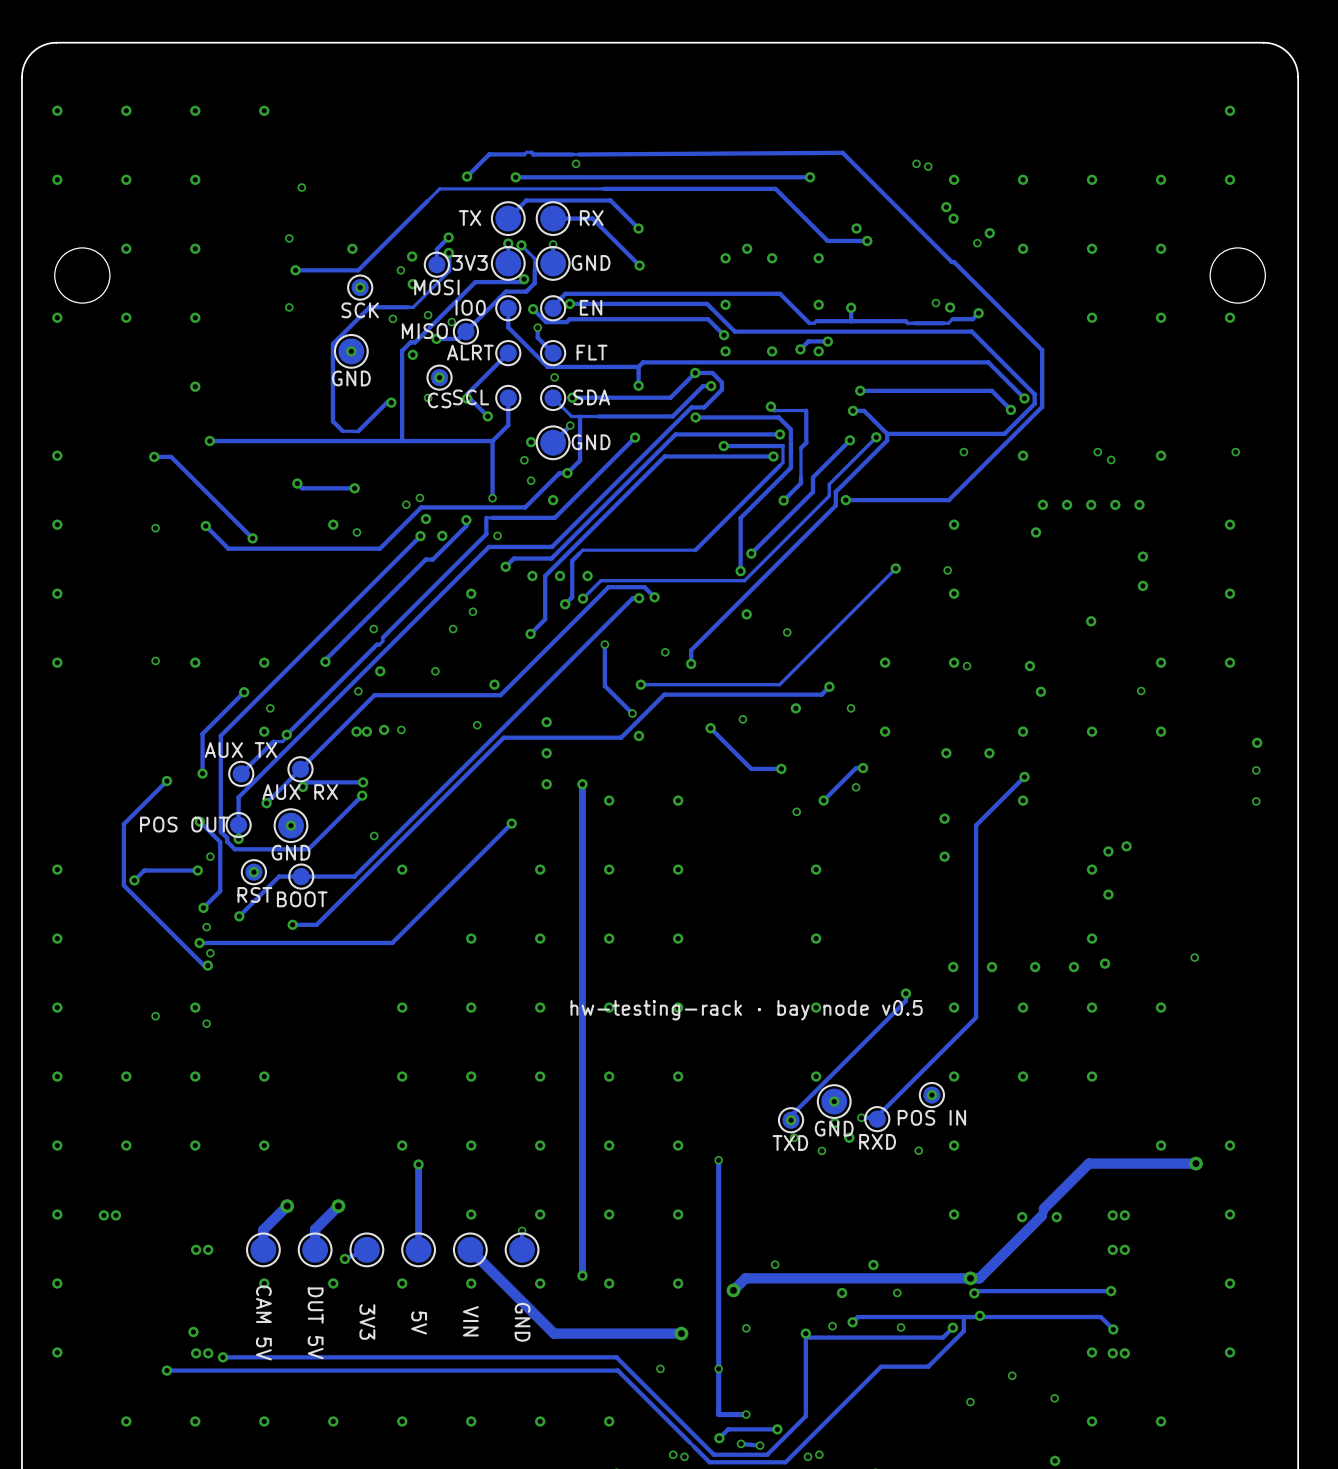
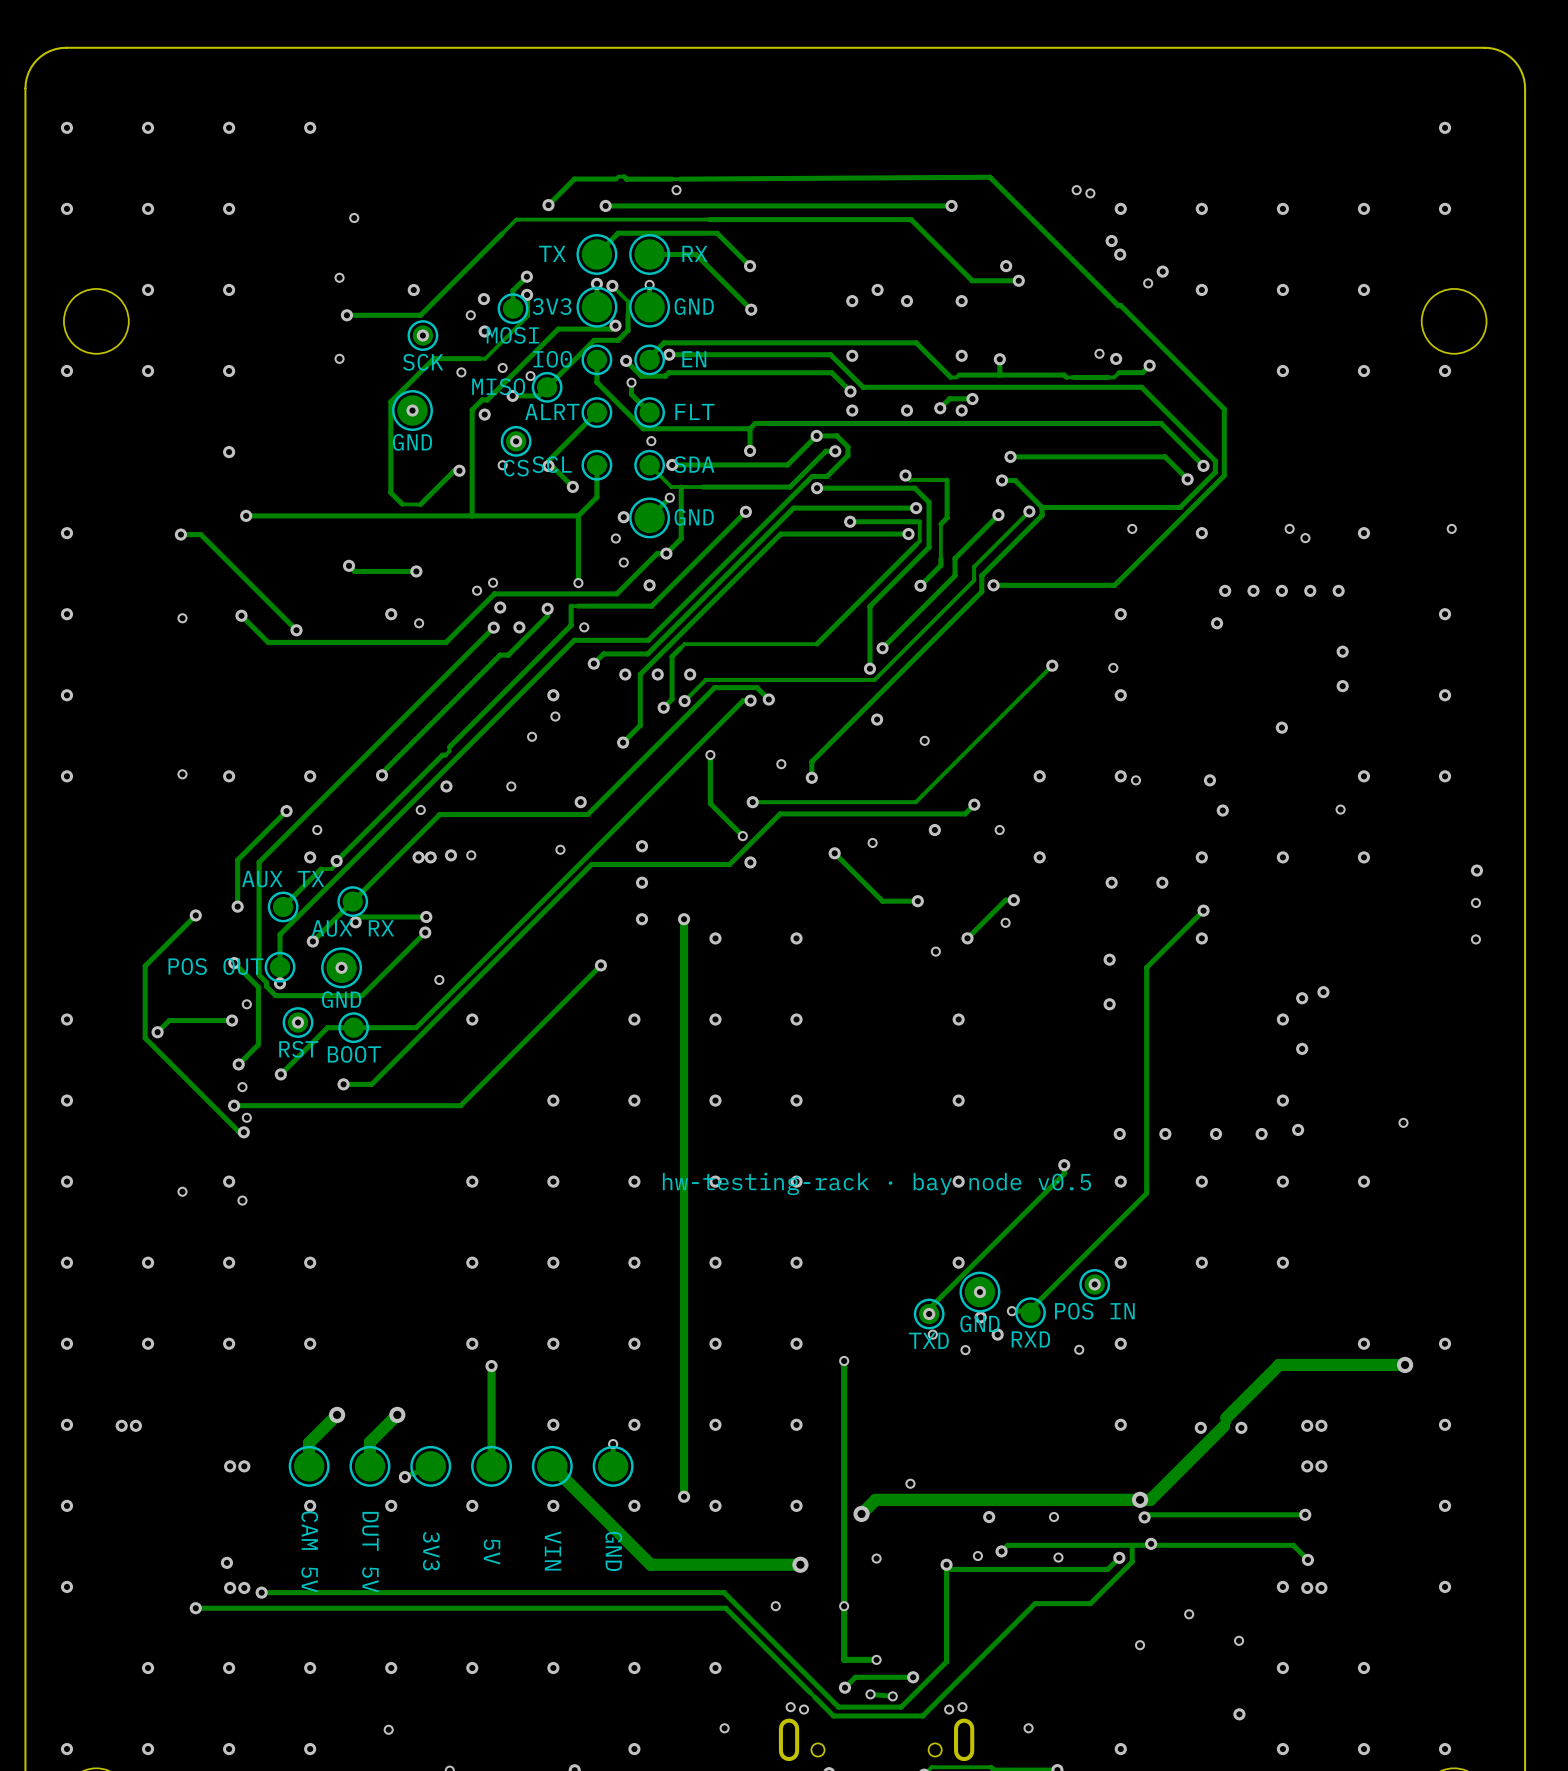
via: (373, 629) -> none
via: (873, 1265) -> none

